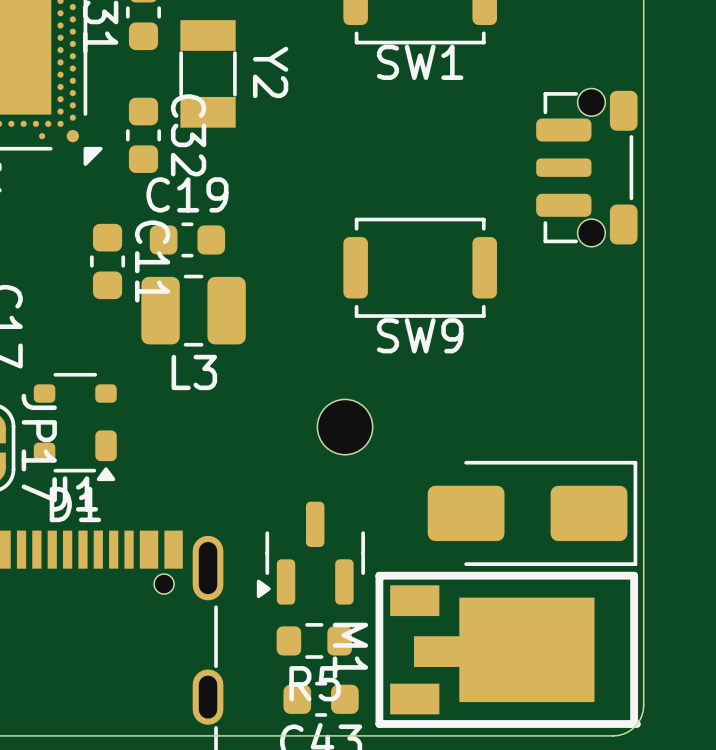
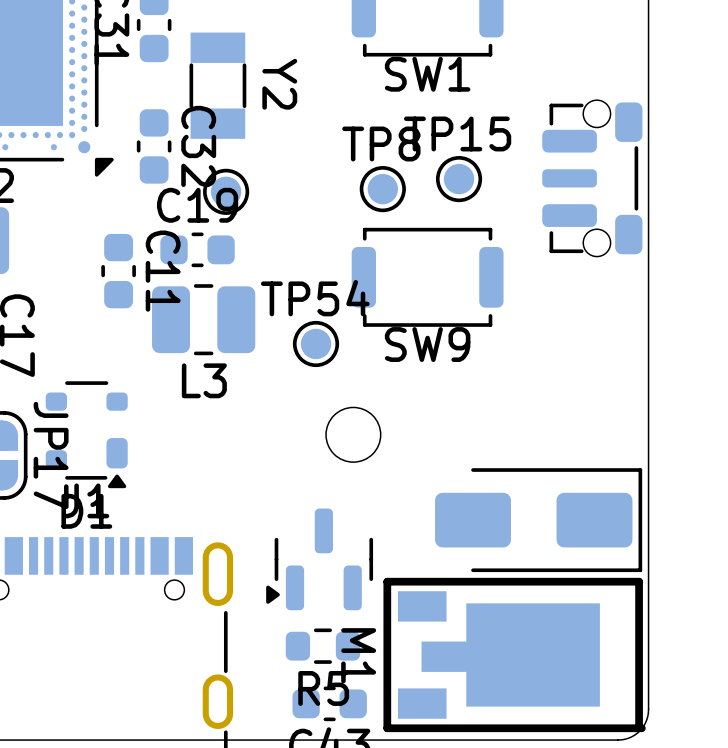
TP15: none -> (459, 179)
TP8: none -> (382, 189)
part: none -> (226, 191)
TP54: none -> (316, 343)

